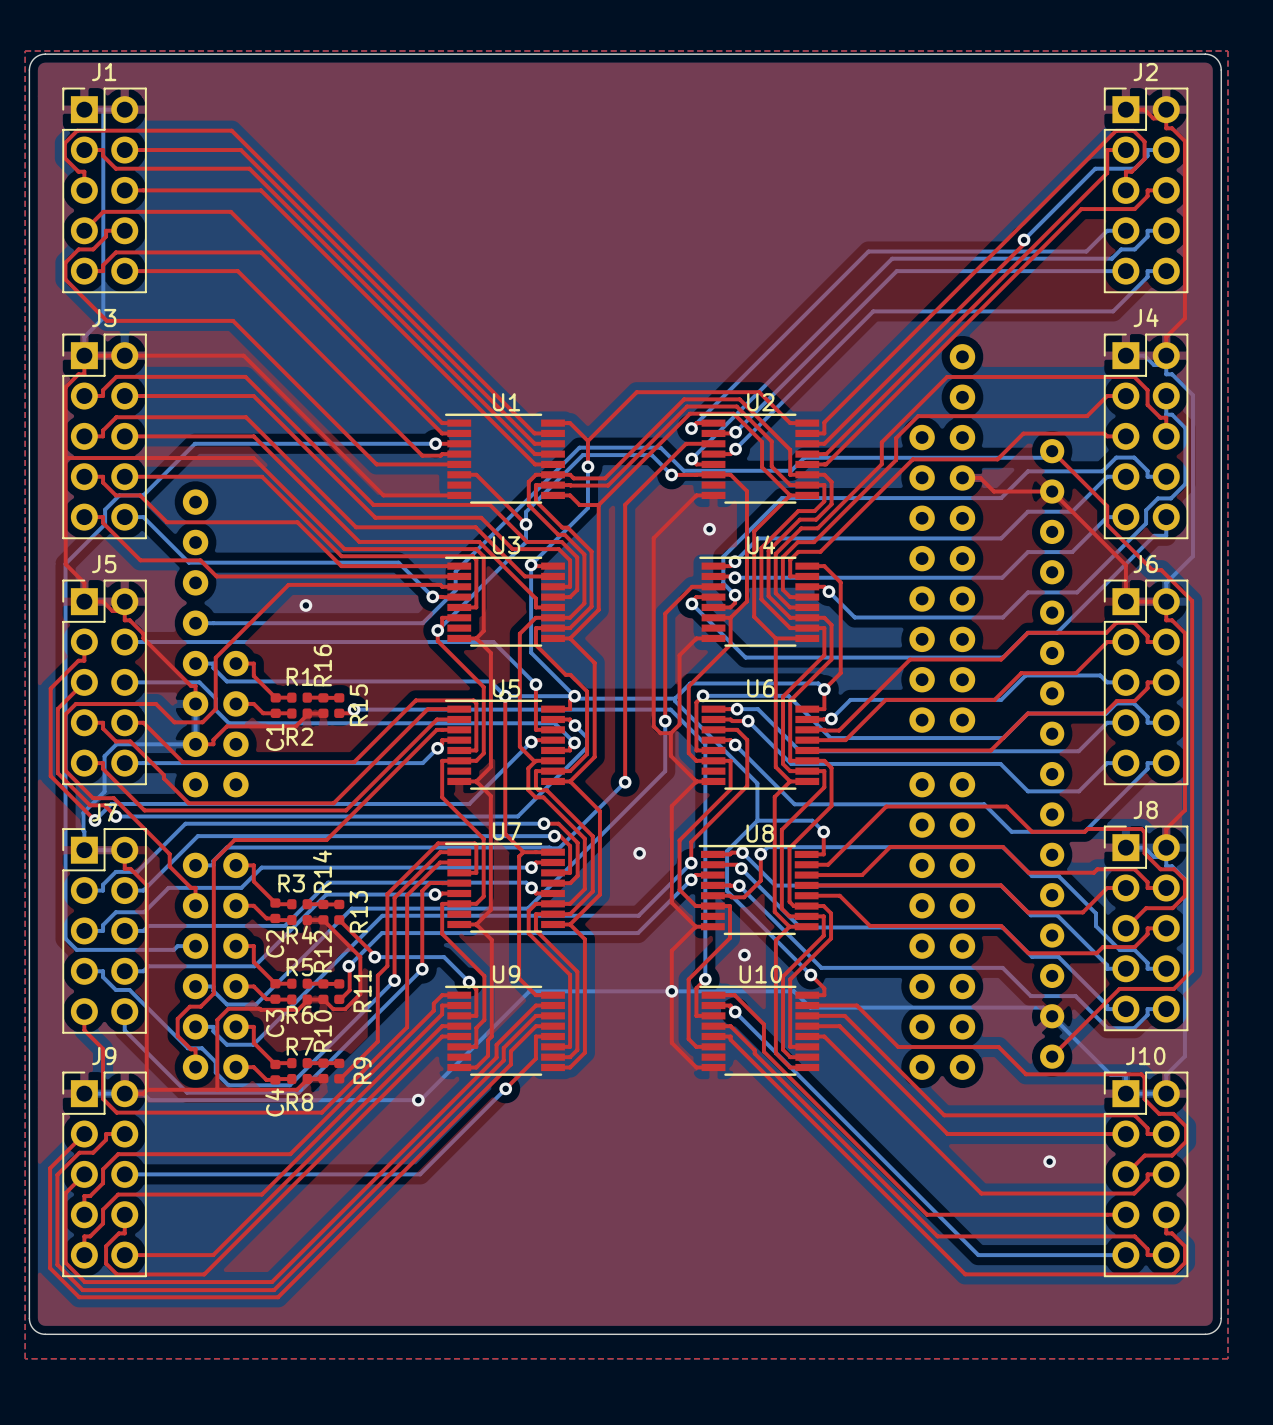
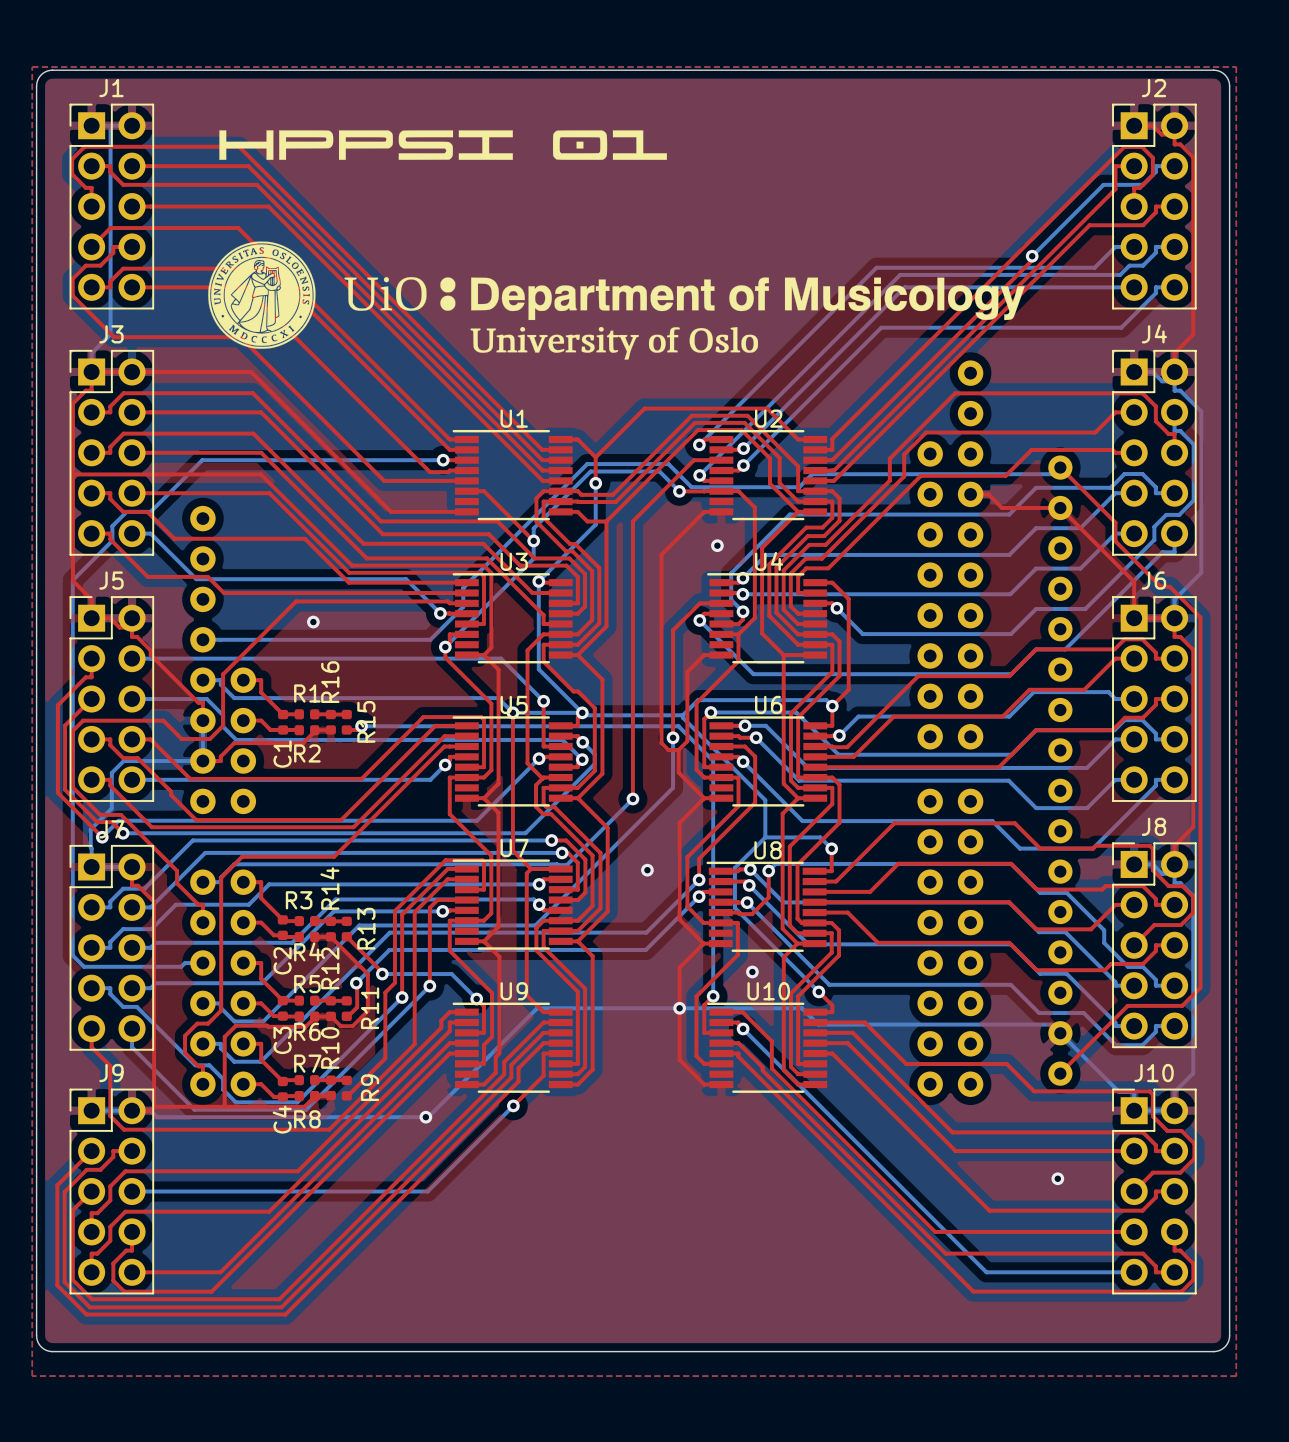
drawing: none -> [219, 130, 667, 160]
drawing: none -> [208, 241, 1025, 360]

